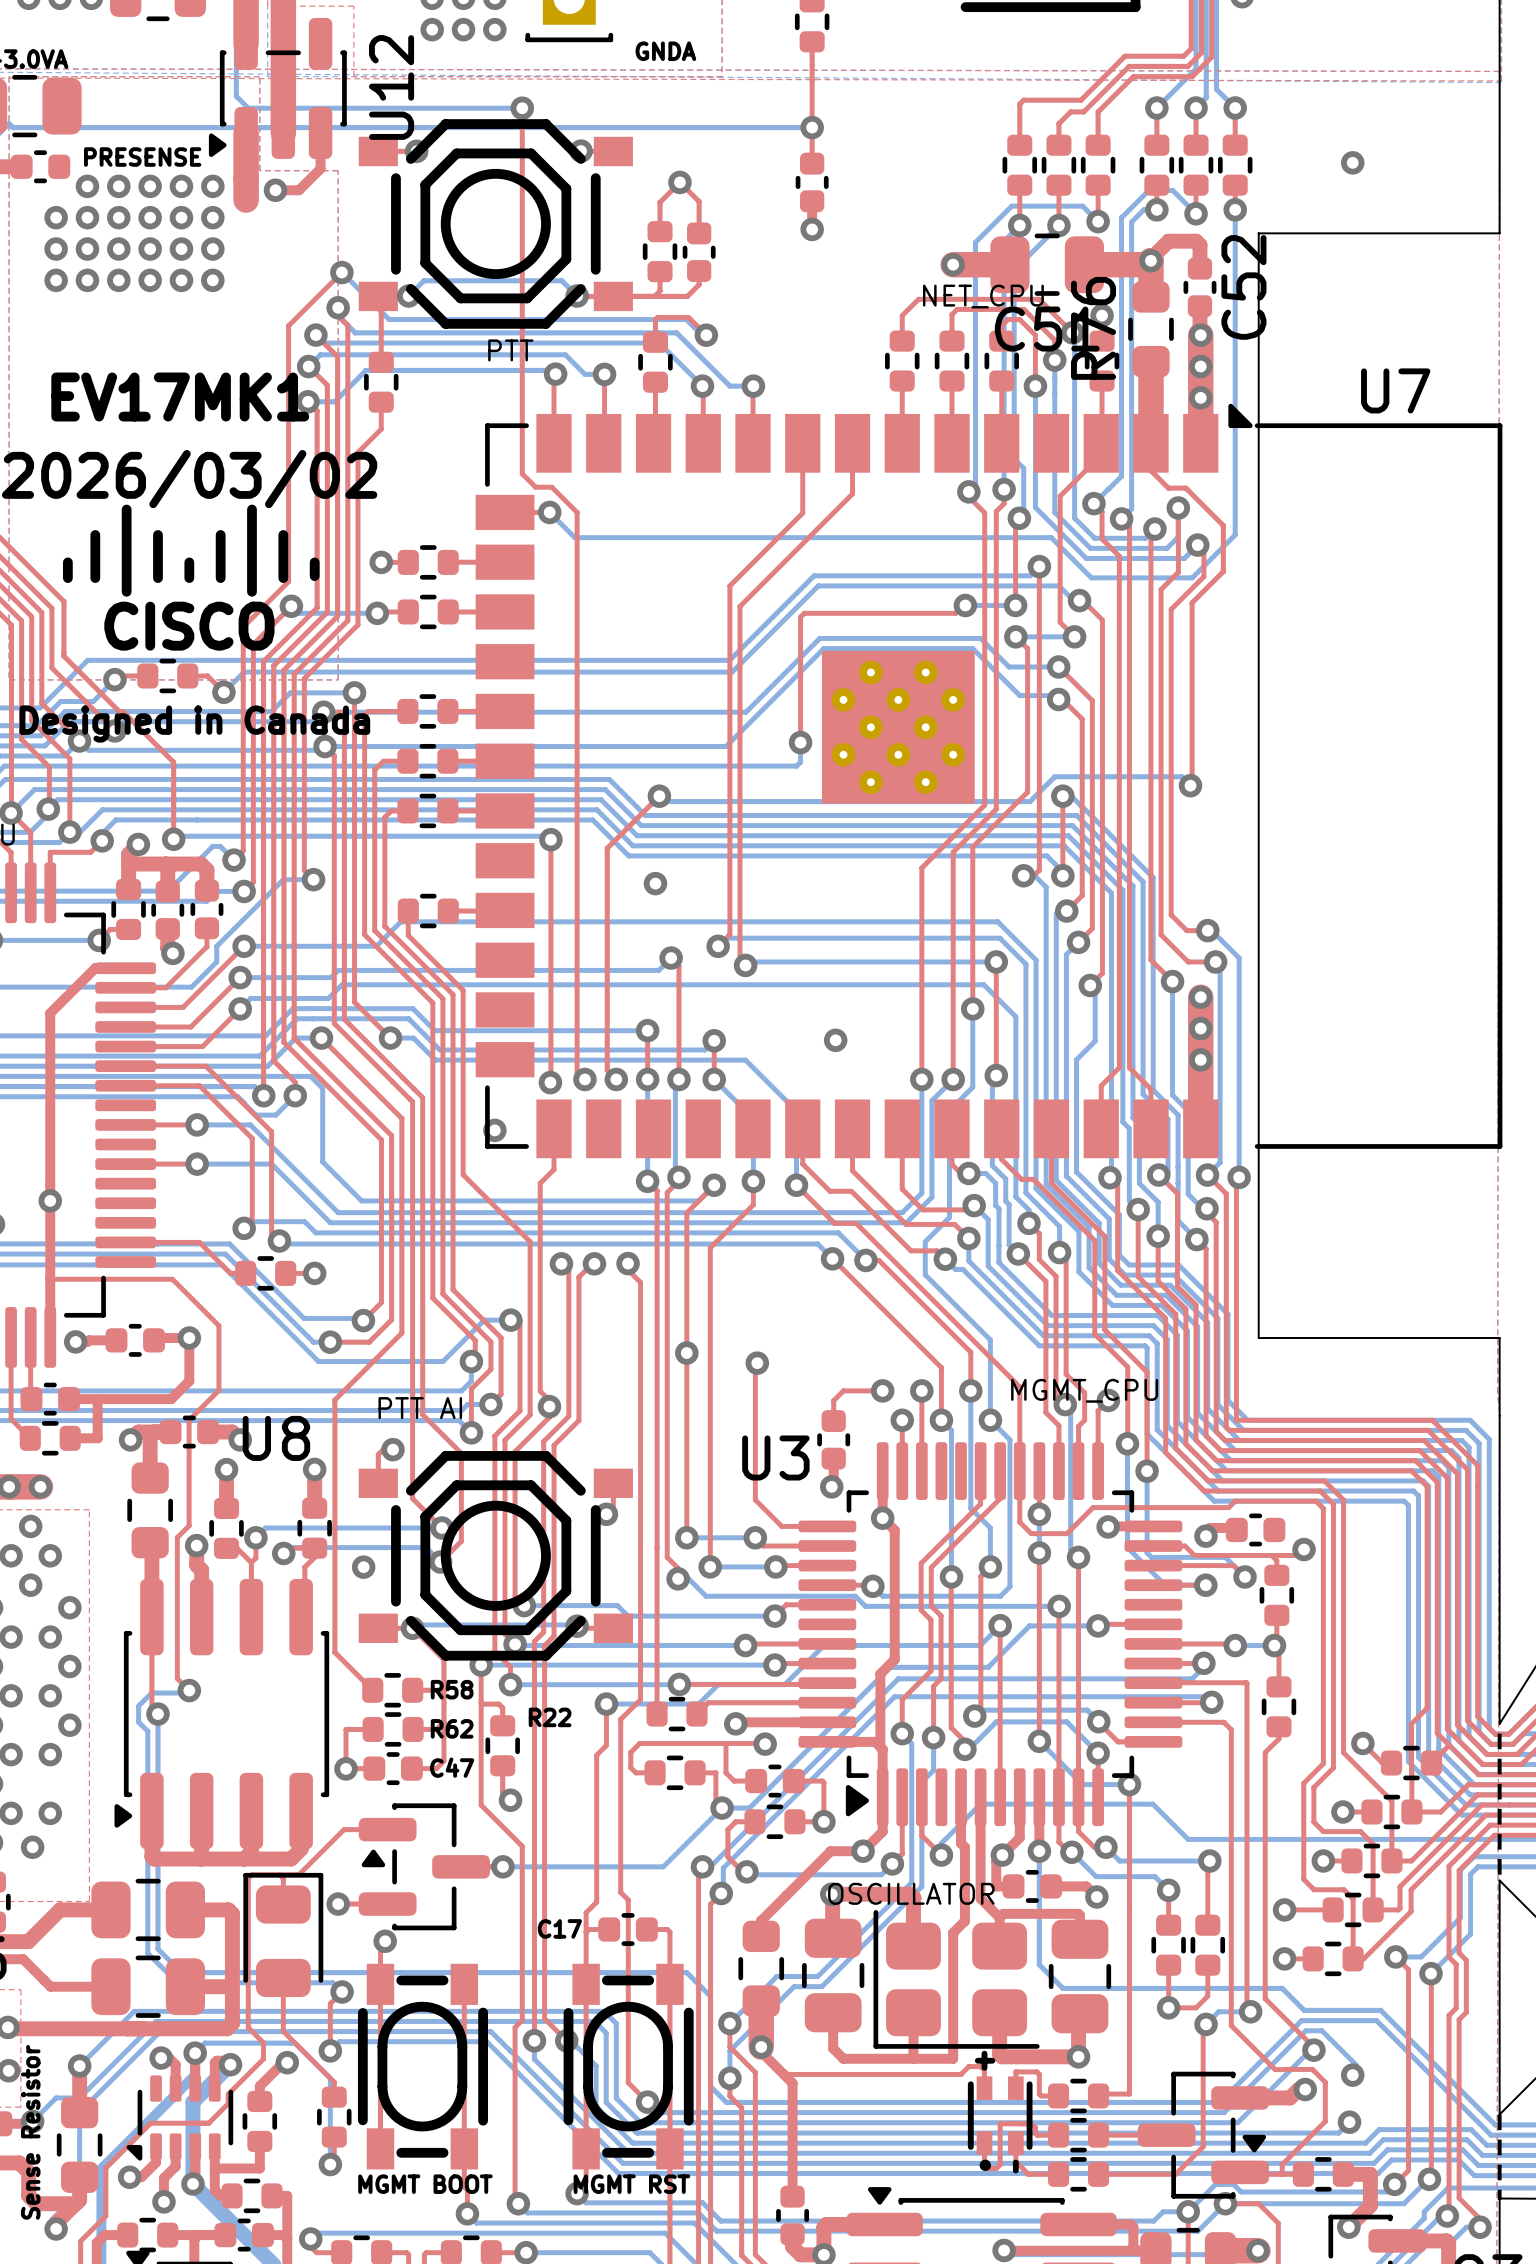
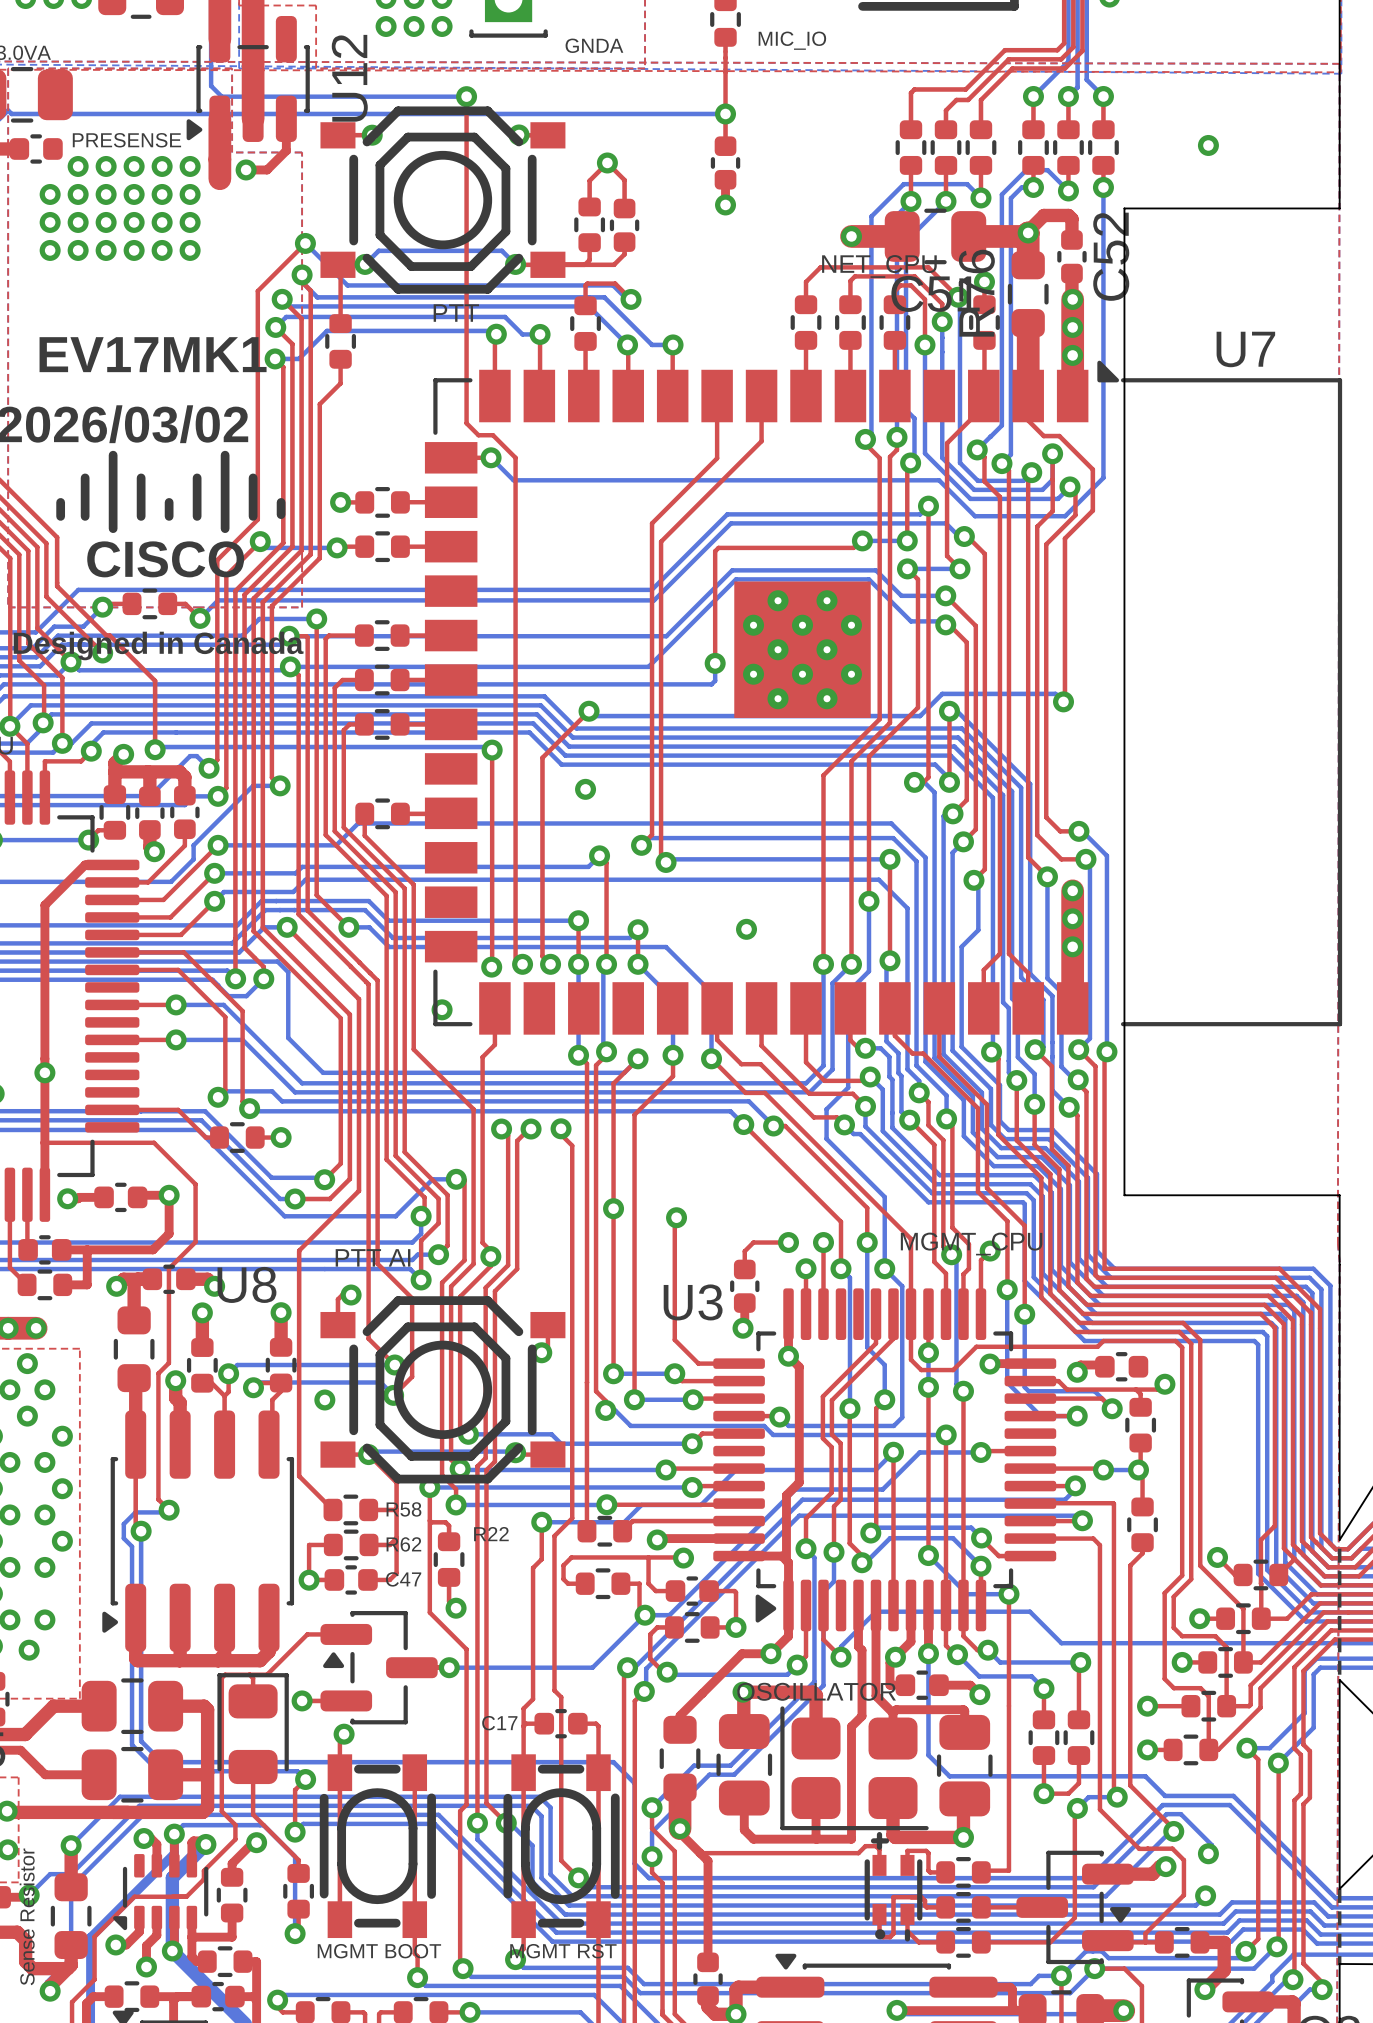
text: none -> MIC_IO (792, 40)

